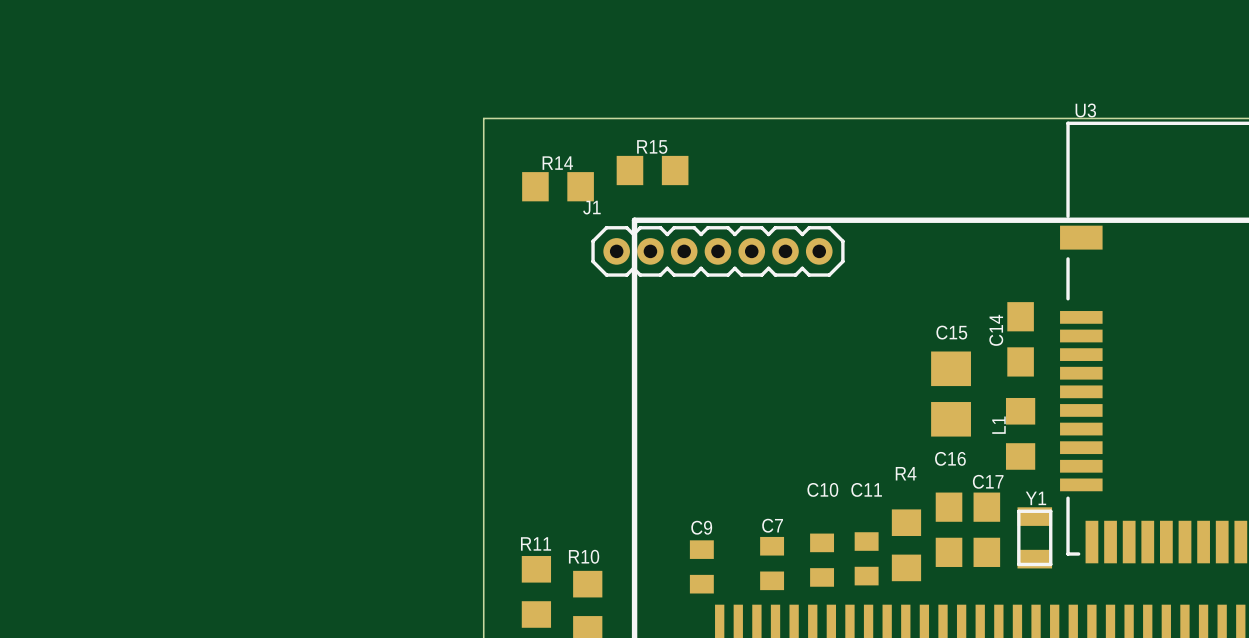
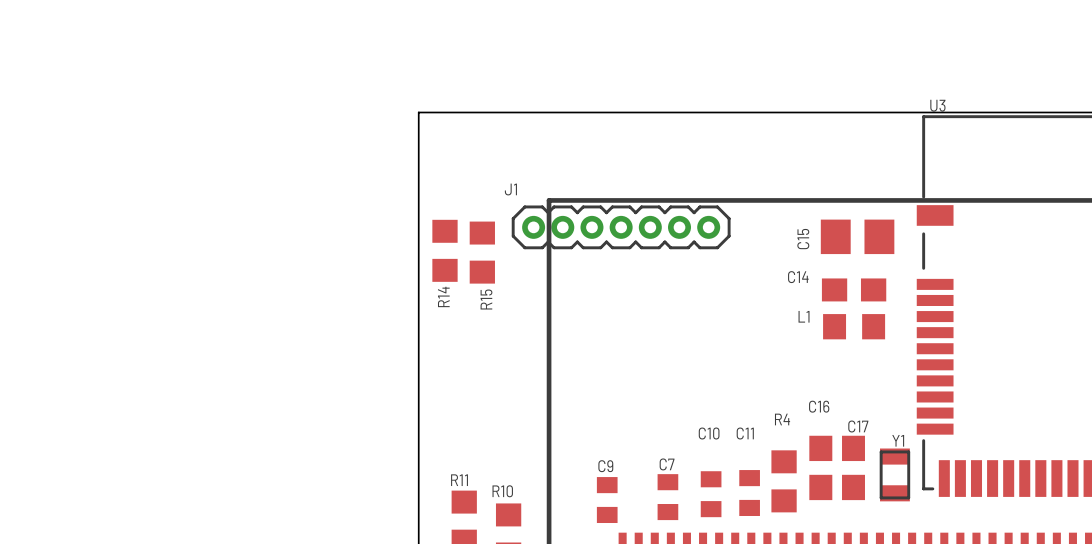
R15 name position: R15 (652, 146) -> R15 (486, 299)
R14 name position: R14 (557, 163) -> R14 (443, 296)
R15 rotation: 0° (652, 170) -> 90° clockwise (482, 252)
R15 position: (652, 170) -> (482, 252)
R14 rotation: 0° (558, 186) -> 90° clockwise (444, 250)
R14 position: (558, 186) -> (444, 250)
C15 name position: C15 (951, 332) -> C15 (803, 239)
C14 rotation: 0° (1020, 339) -> 90° clockwise (854, 289)
C15 rotation: 0° (951, 394) -> 90° clockwise (857, 236)
C15 position: (951, 394) -> (857, 236)
L1 rotation: 0° (1020, 433) -> 90° clockwise (854, 326)
L1 position: (1020, 433) -> (854, 326)

